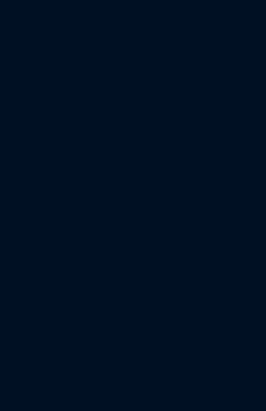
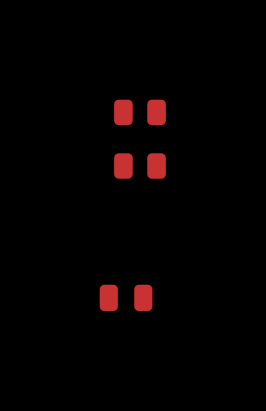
part: none -> (139, 112)
part: none -> (139, 166)
part: none -> (126, 297)

